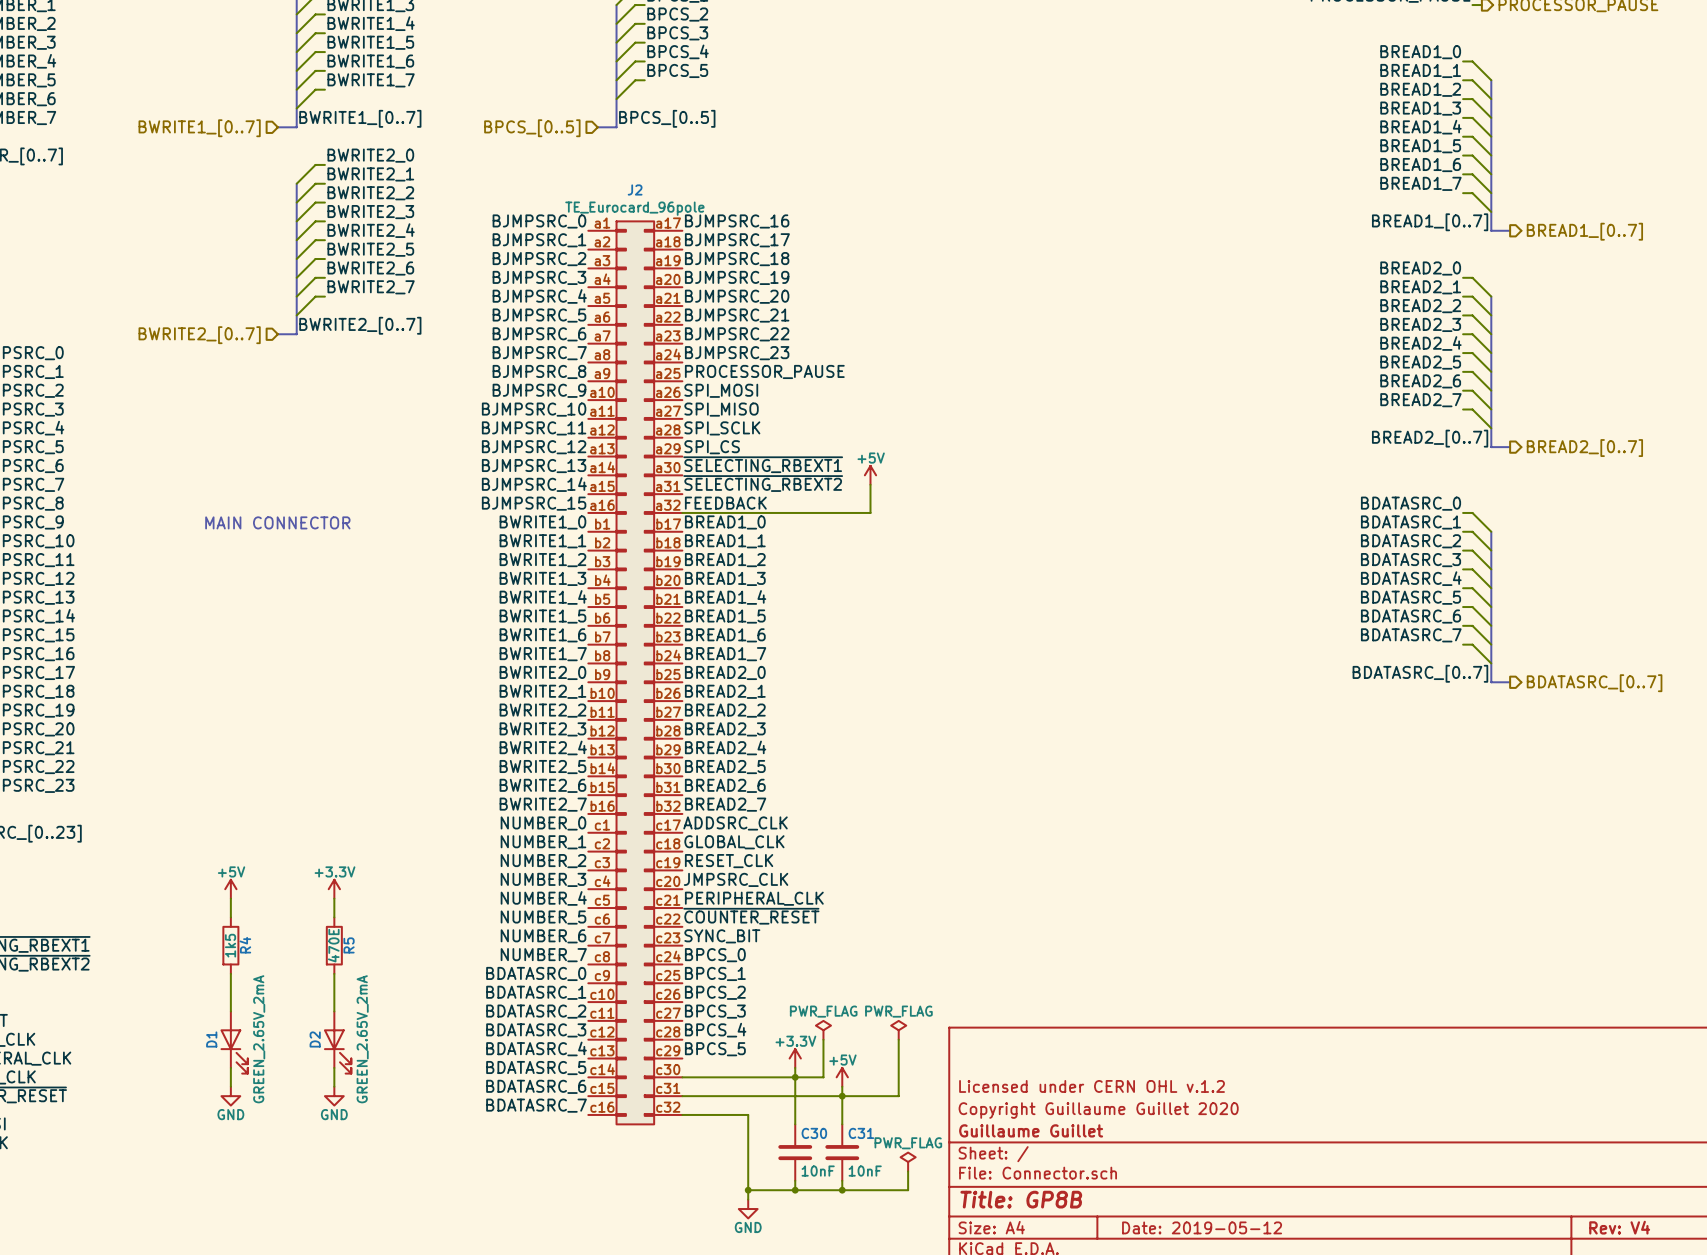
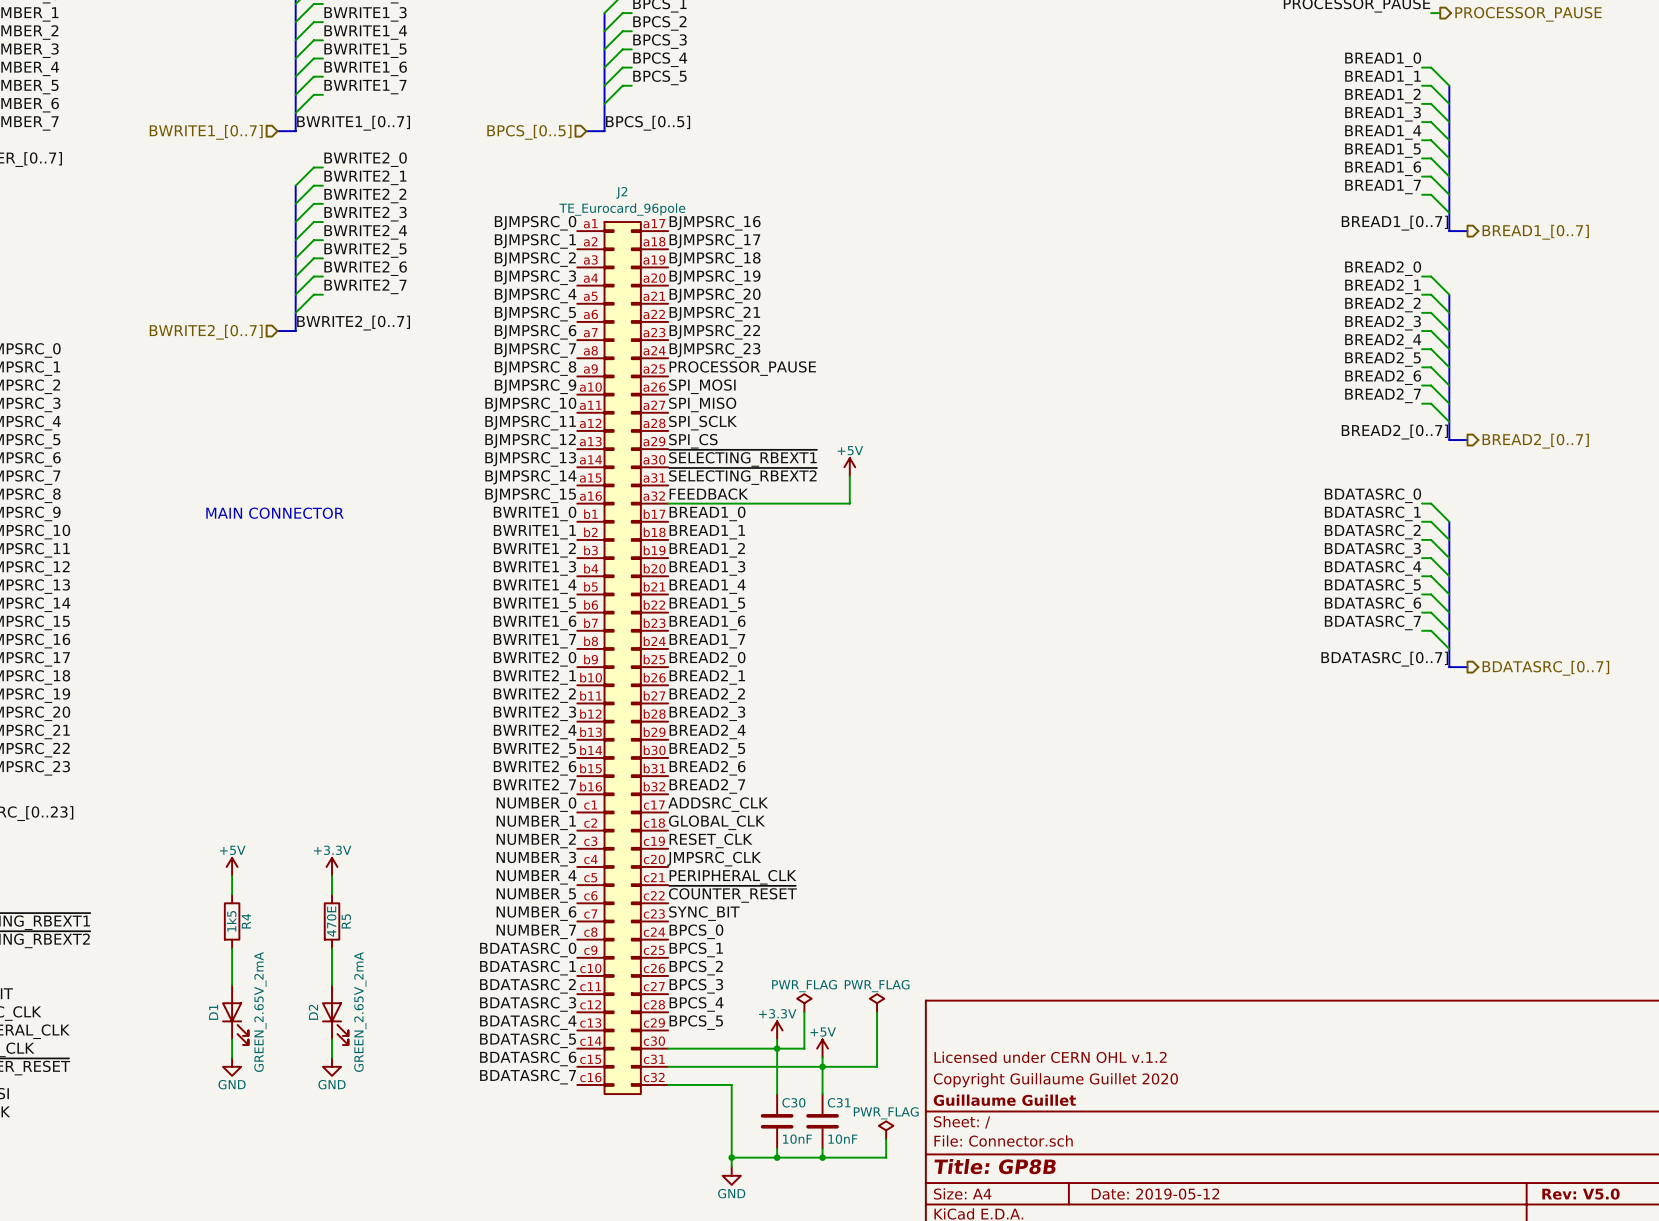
title block: Rev: V4 (1619, 1227) -> Rev: V5.0 (1580, 1194)

